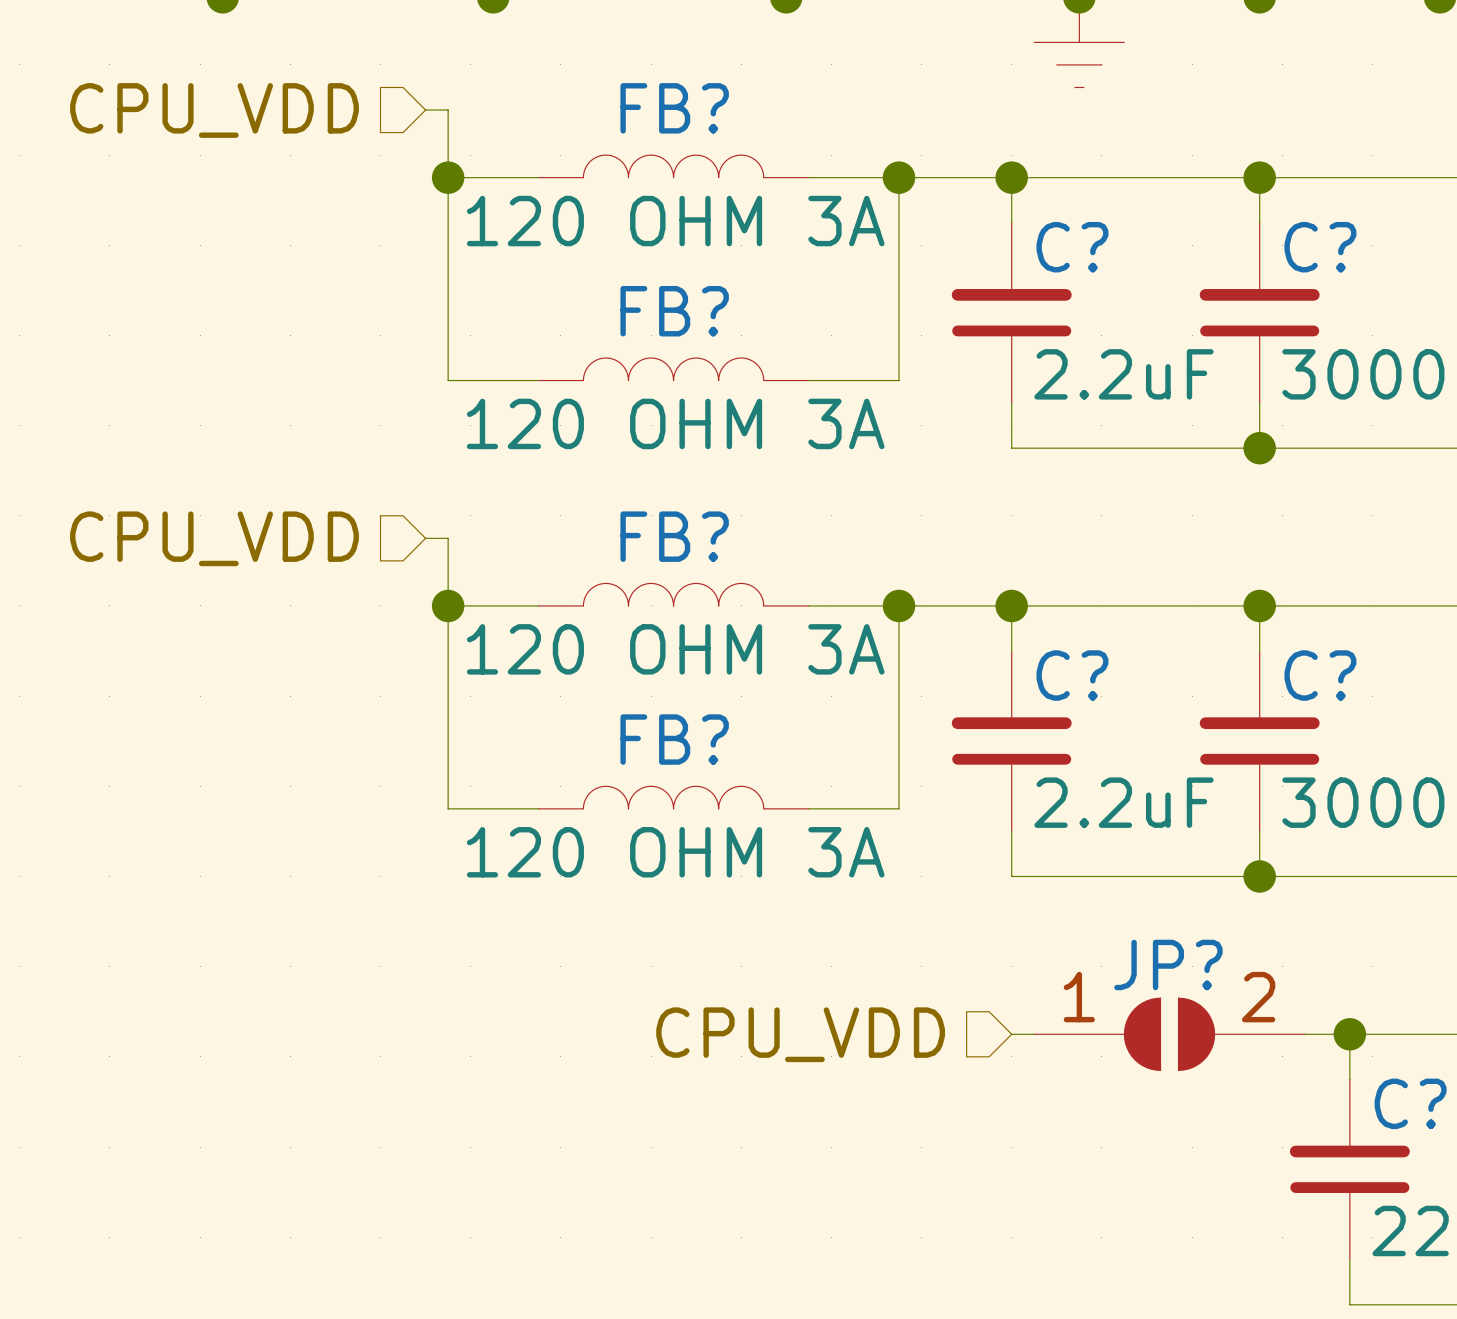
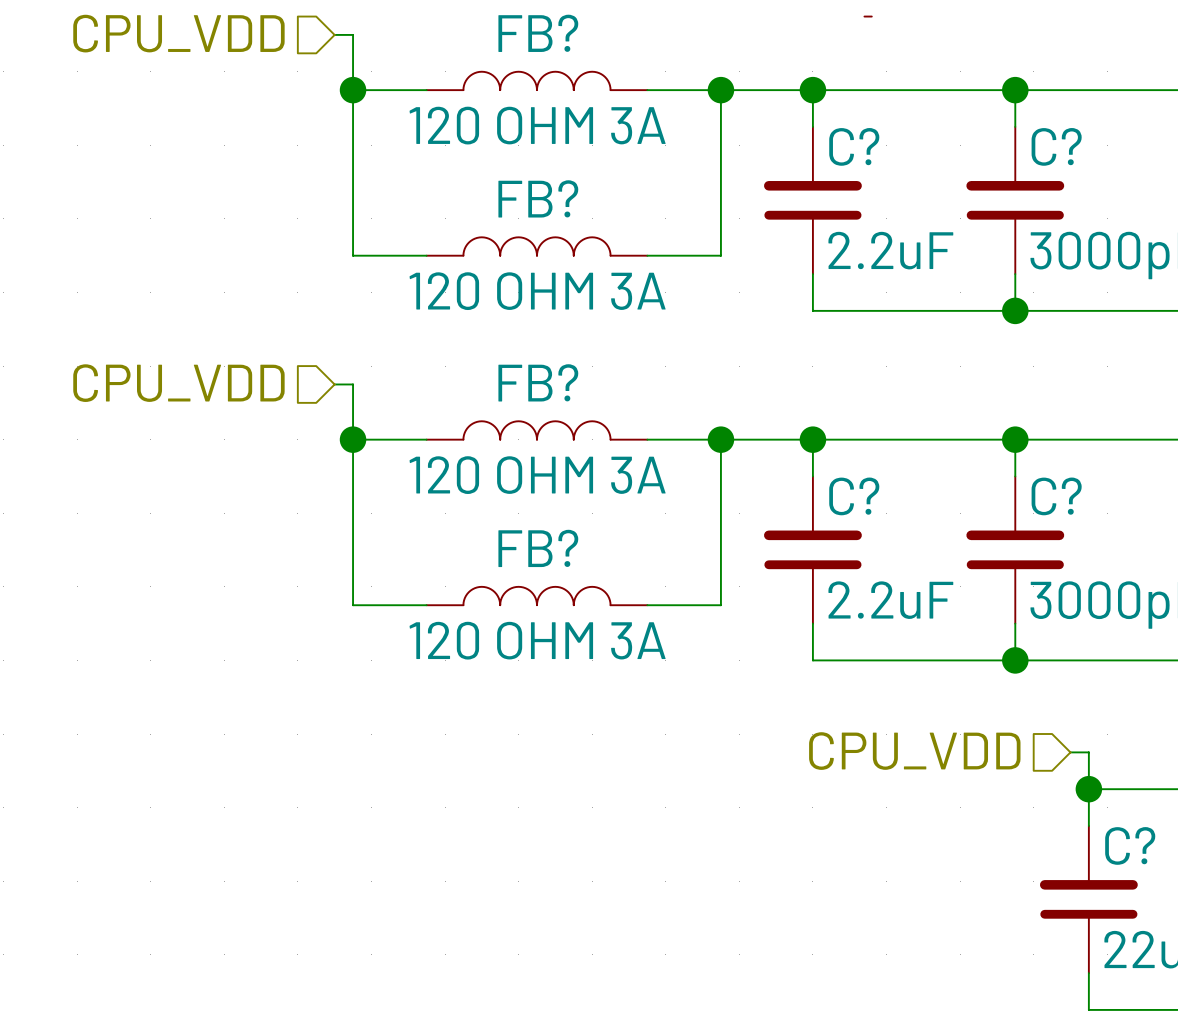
hierarchical label position: CPU_VDD (800, 1034) -> CPU_VDD (914, 751)
wire: (1011, 1034) (1034, 1034) -> none
JP?: (1169, 1034) -> none
wire: (1304, 1034) (1349, 1034) -> (1070, 752) (1088, 752) (1088, 789)

